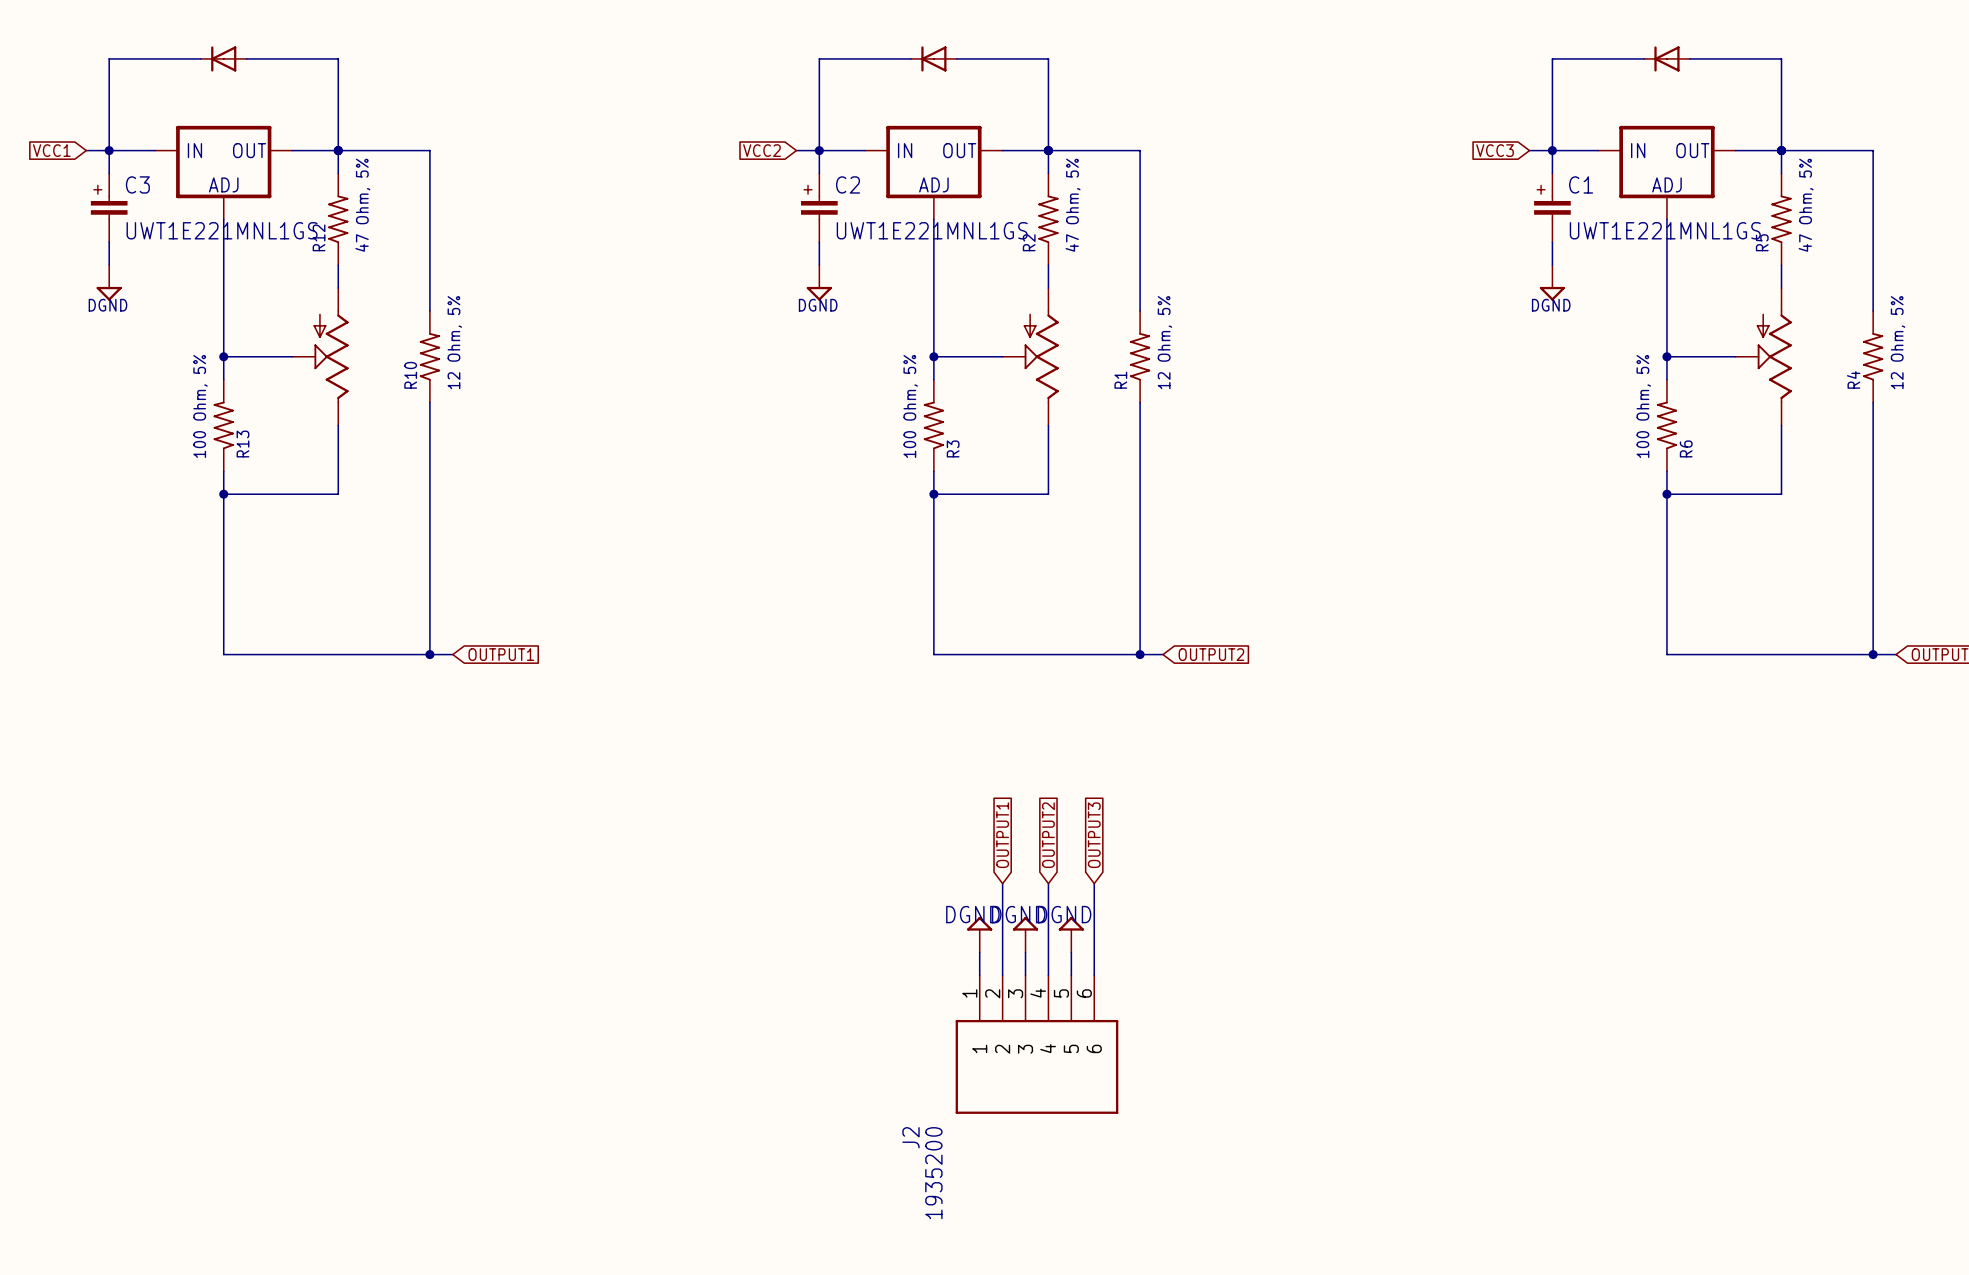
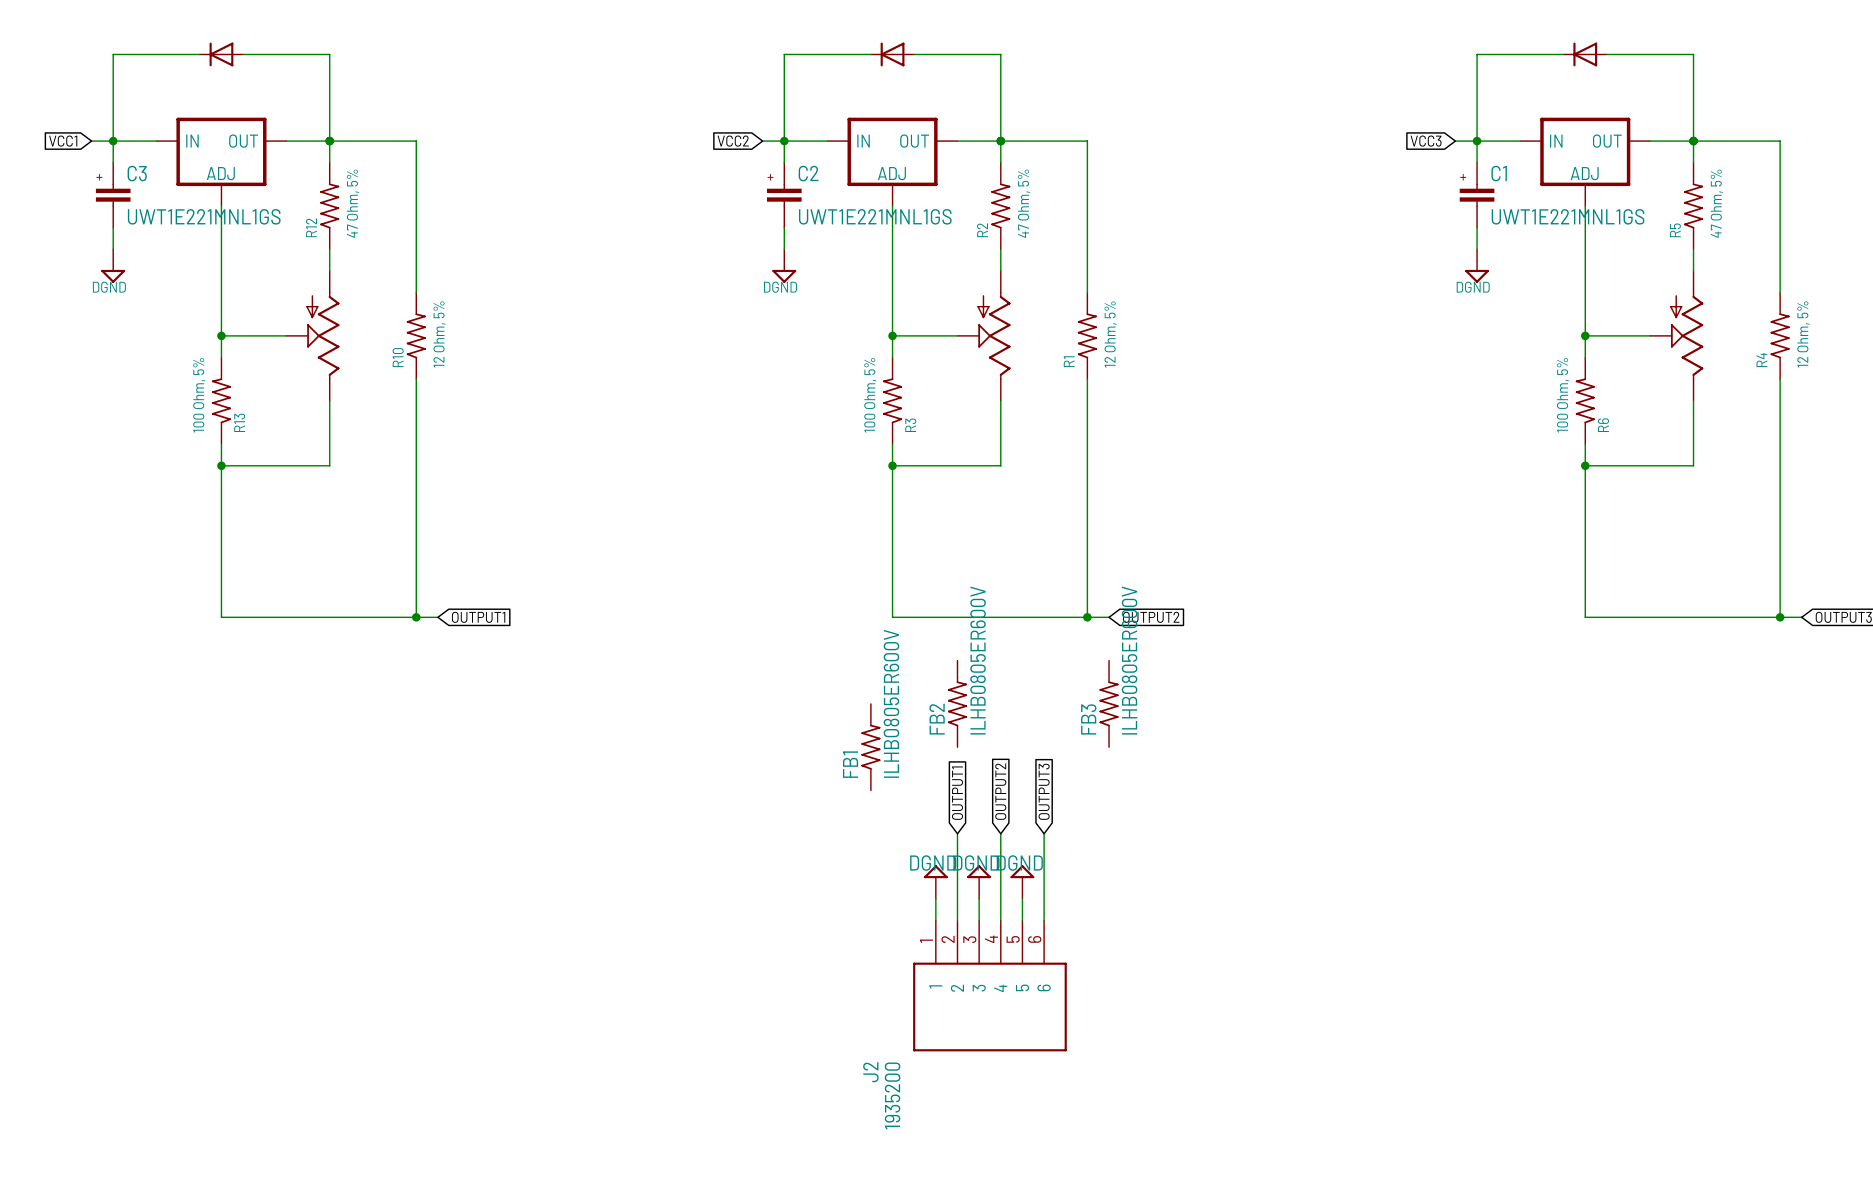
FB2: none -> ILHB0805ER600V (957, 703)
FB3: none -> ILHB0805ER600V (1109, 703)
FB1: none -> ILHB0805ER600V (870, 747)

